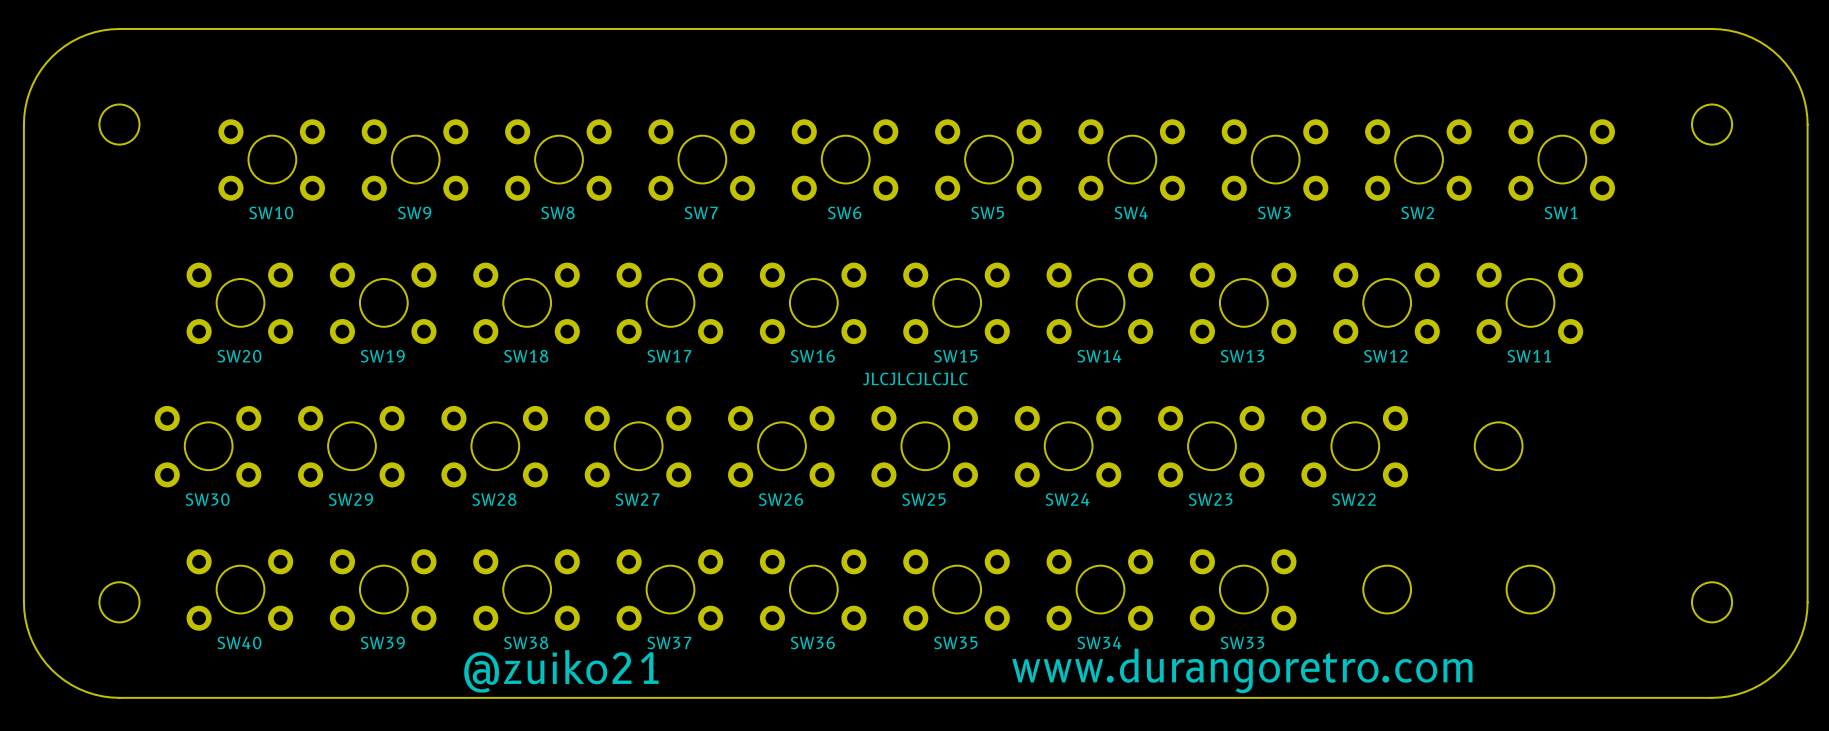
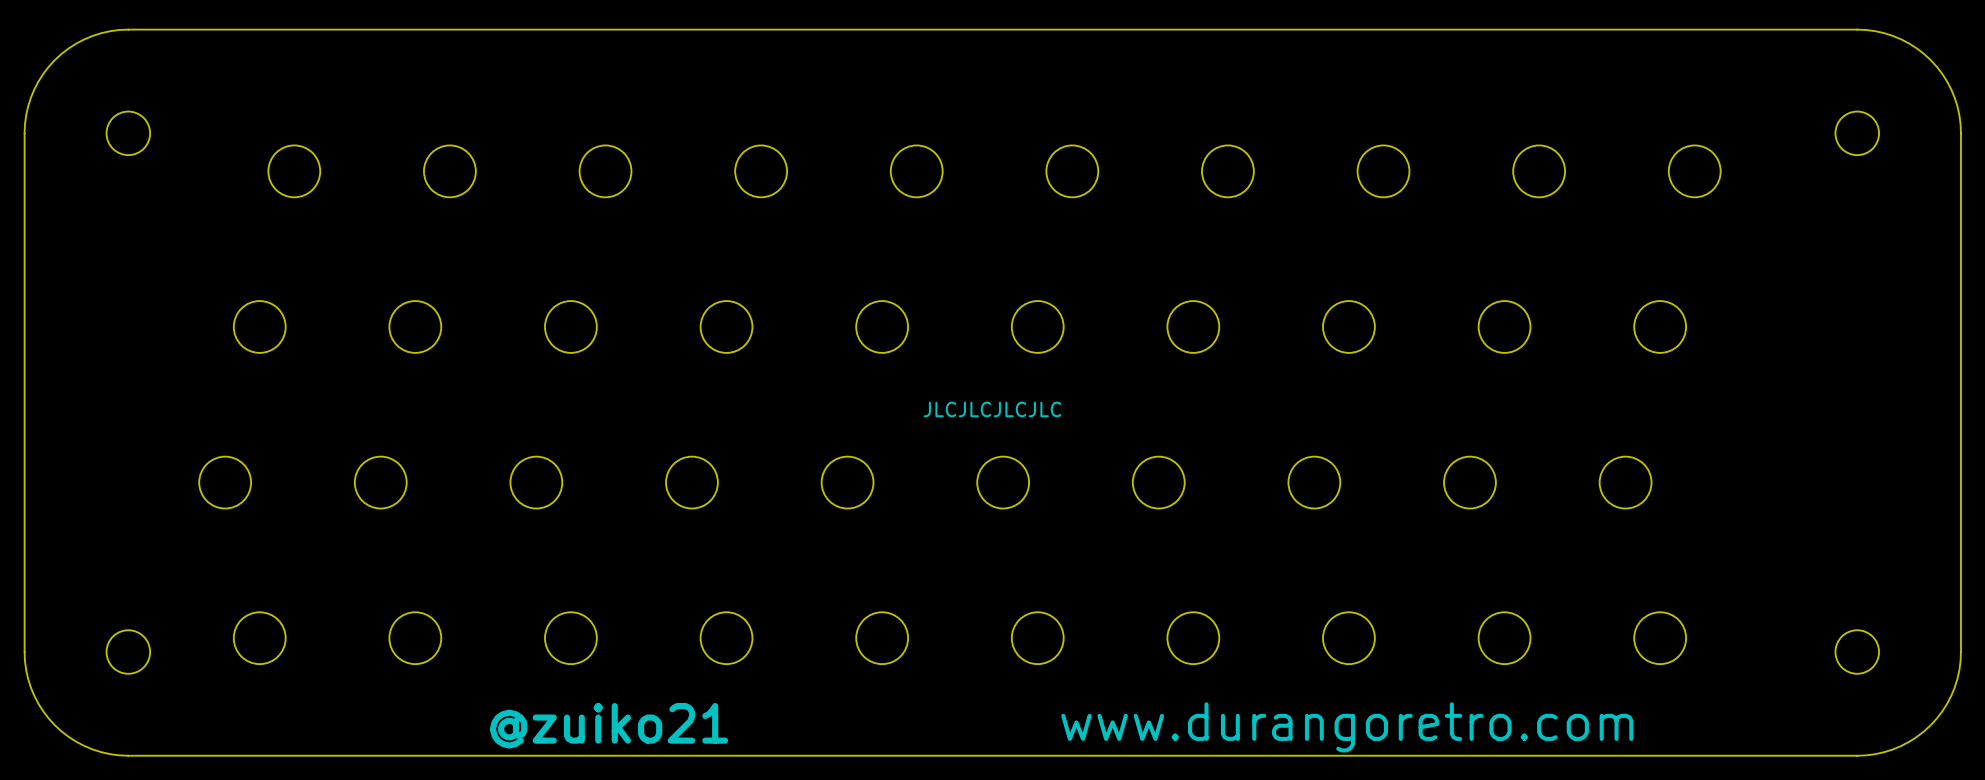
SW10: (271, 160) -> none
SW9: (415, 160) -> none
SW8: (558, 160) -> none
SW7: (701, 160) -> none
SW6: (845, 160) -> none
SW5: (988, 160) -> none
SW4: (1131, 160) -> none
SW3: (1275, 160) -> none
SW2: (1418, 160) -> none
SW1: (1561, 160) -> none
SW20: (239, 303) -> none
SW19: (383, 303) -> none
SW18: (526, 303) -> none
SW17: (669, 303) -> none
SW16: (813, 303) -> none
SW15: (956, 303) -> none
SW14: (1099, 303) -> none
SW13: (1243, 303) -> none
SW12: (1386, 303) -> none
SW11: (1529, 303) -> none
SW30: (208, 446) -> none
SW29: (351, 446) -> none
SW28: (494, 446) -> none
SW27: (638, 446) -> none
SW26: (781, 446) -> none
SW25: (924, 446) -> none
SW24: (1068, 446) -> none
SW23: (1211, 446) -> none
SW22: (1354, 446) -> none
SW40: (239, 590) -> none
SW39: (383, 590) -> none
SW38: (526, 590) -> none
SW37: (669, 590) -> none
SW36: (813, 590) -> none
SW35: (956, 590) -> none
SW34: (1099, 590) -> none
SW33: (1243, 590) -> none

